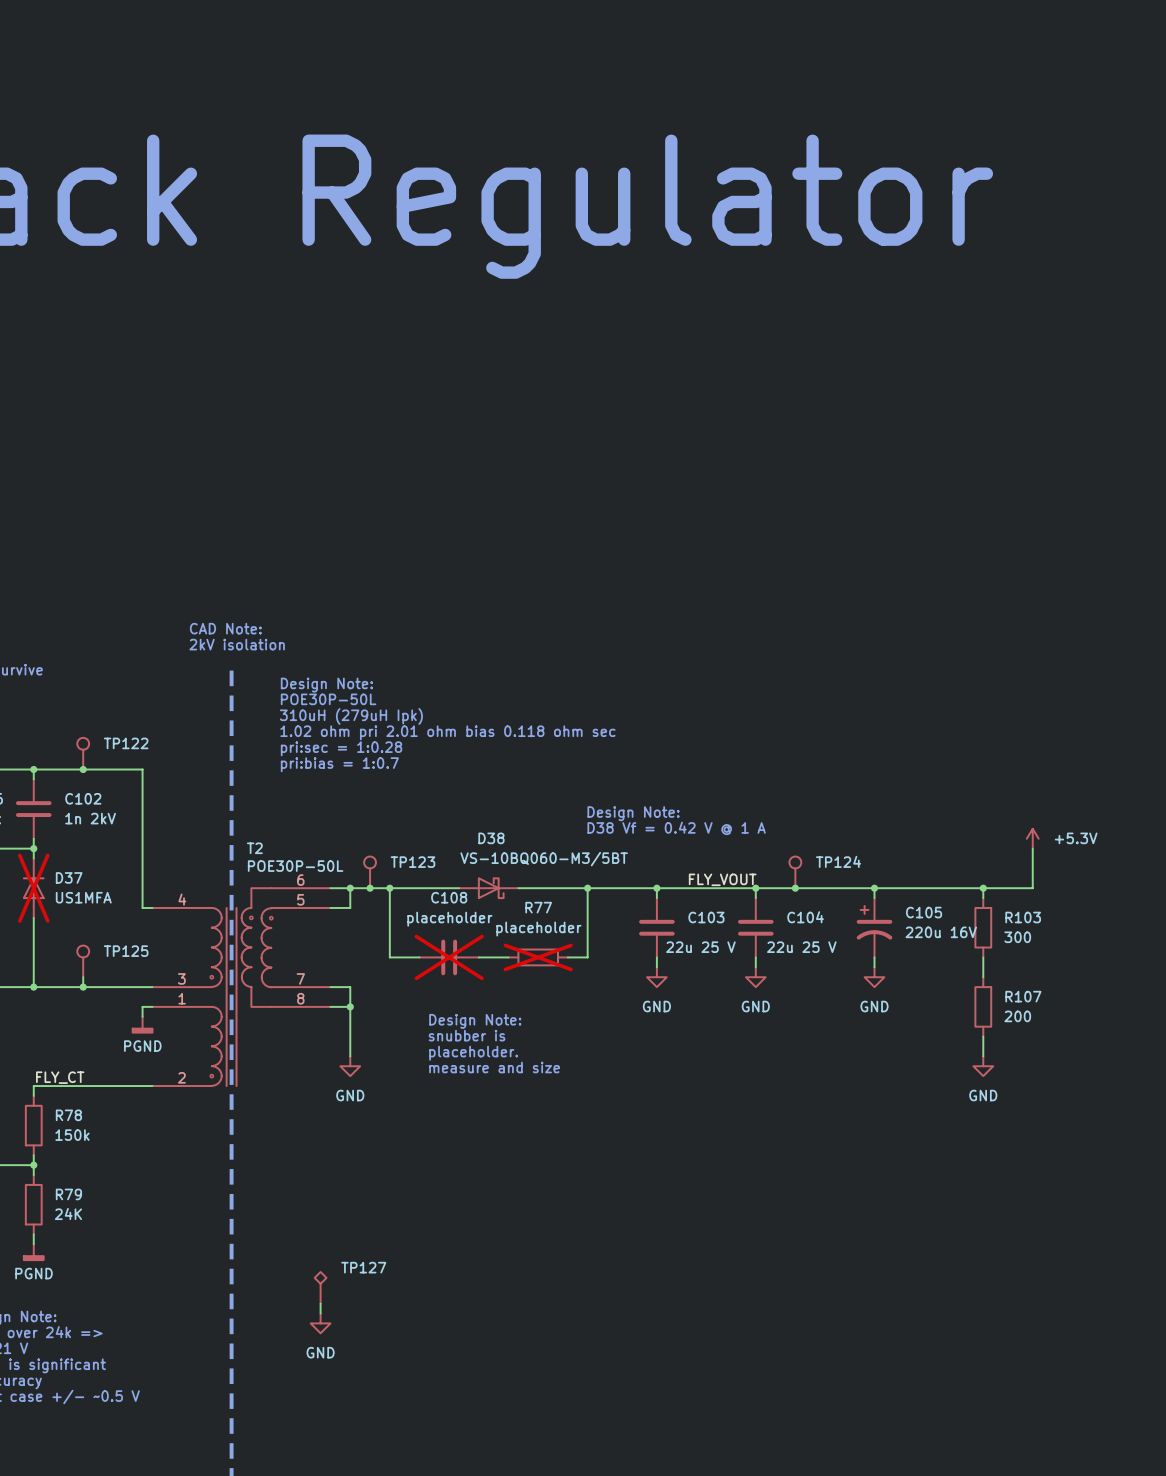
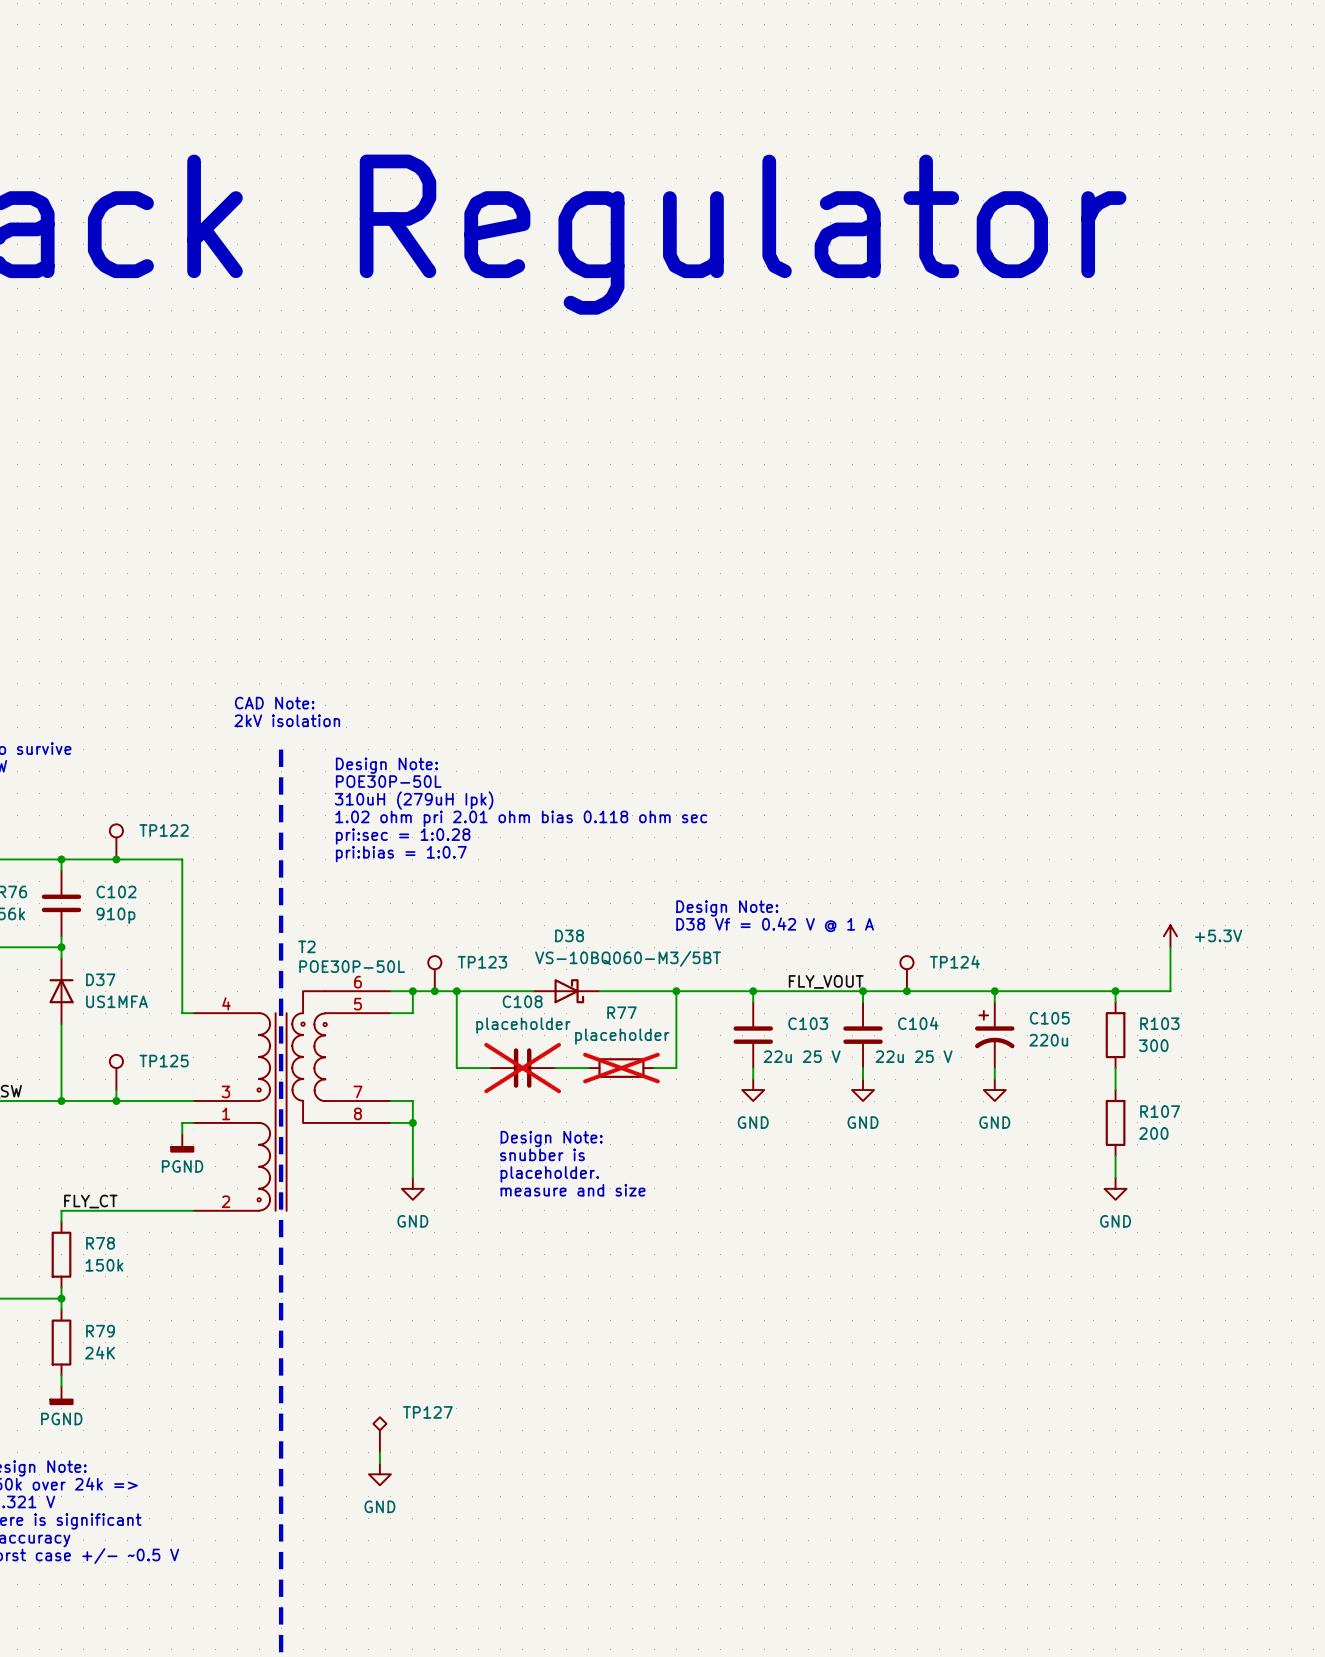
C102 value: 1n 2kV (90, 818) -> 910p (115, 915)
D37 do-not-place cross: (33, 888) -> none
C105 value: 220u 16V (941, 932) -> 220u (1048, 1040)

